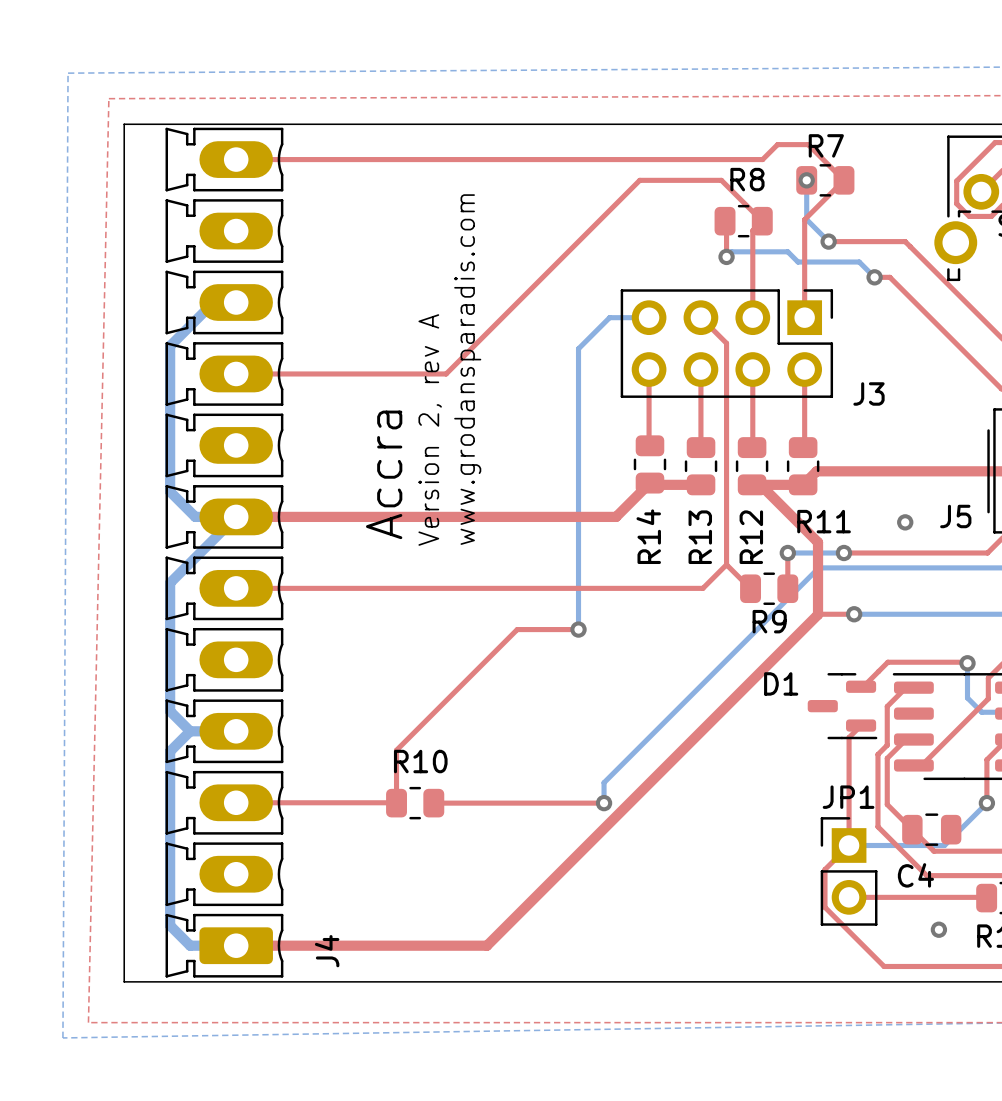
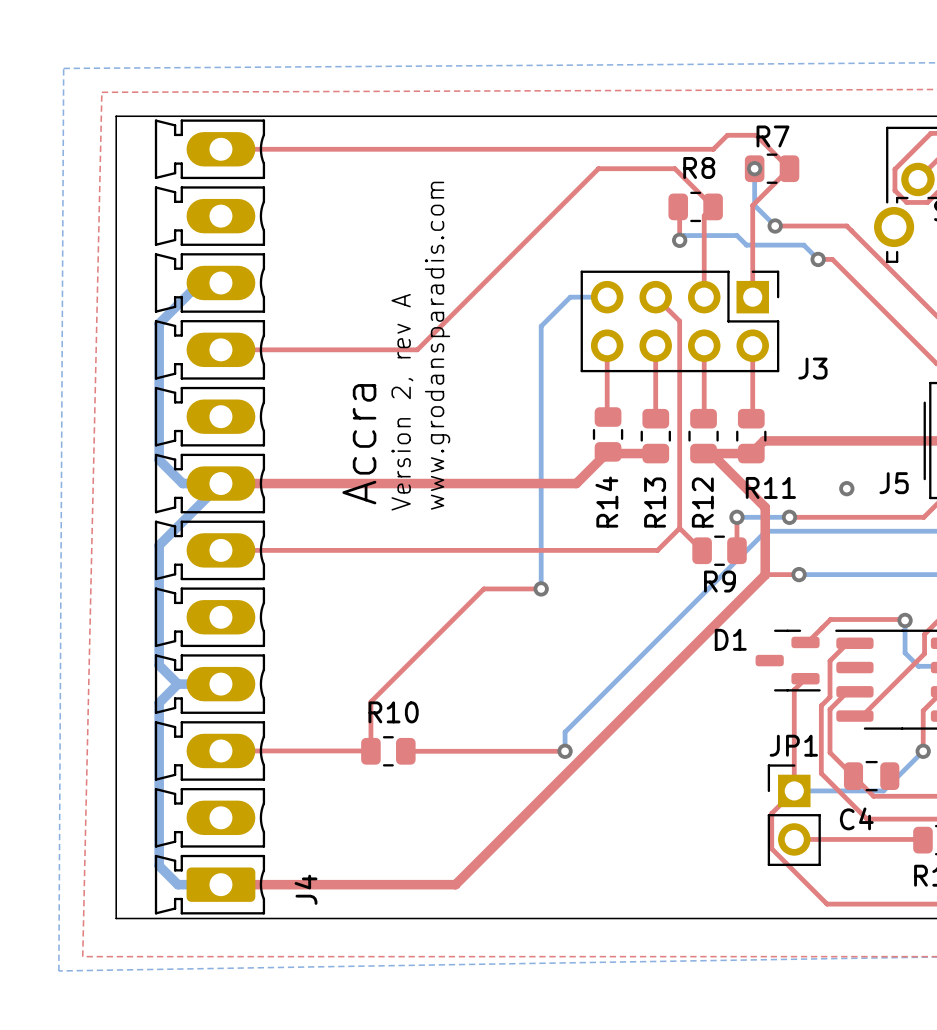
via: (938, 929) -> none

